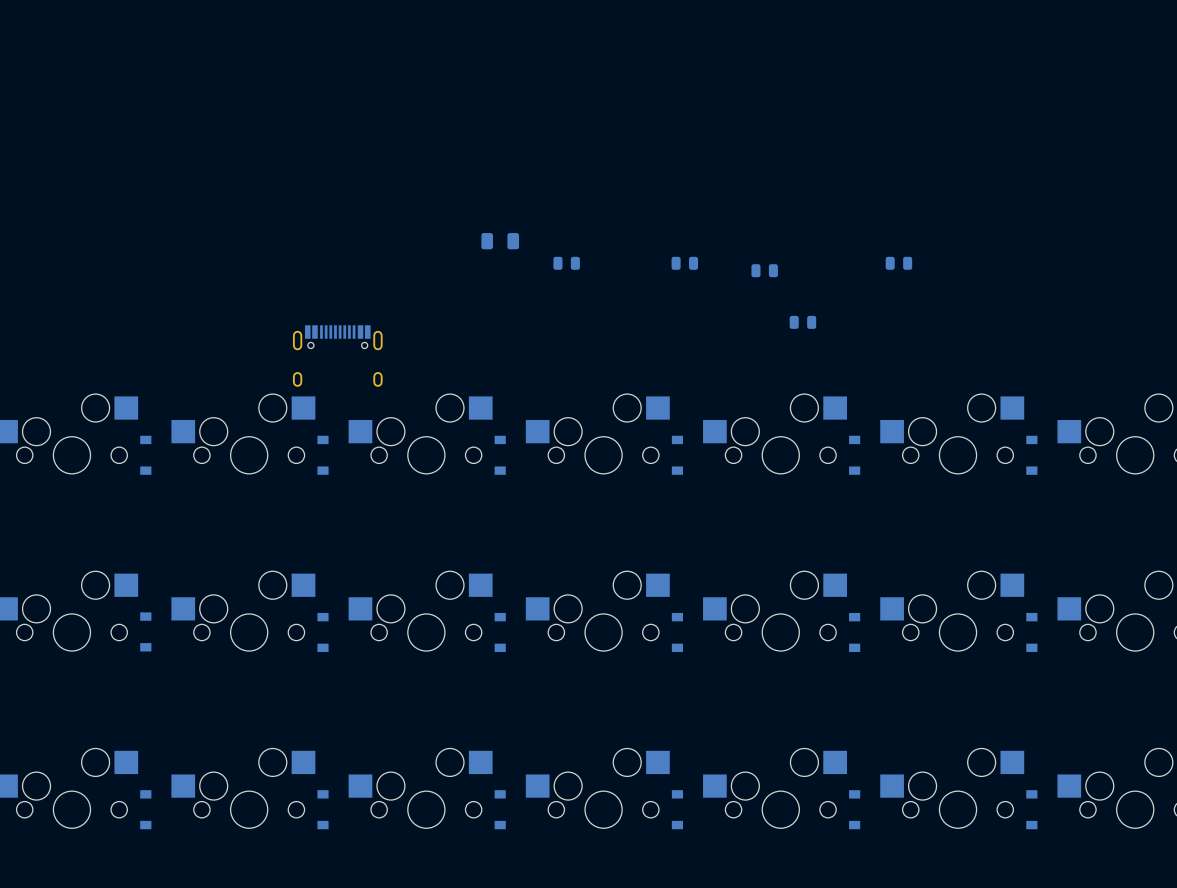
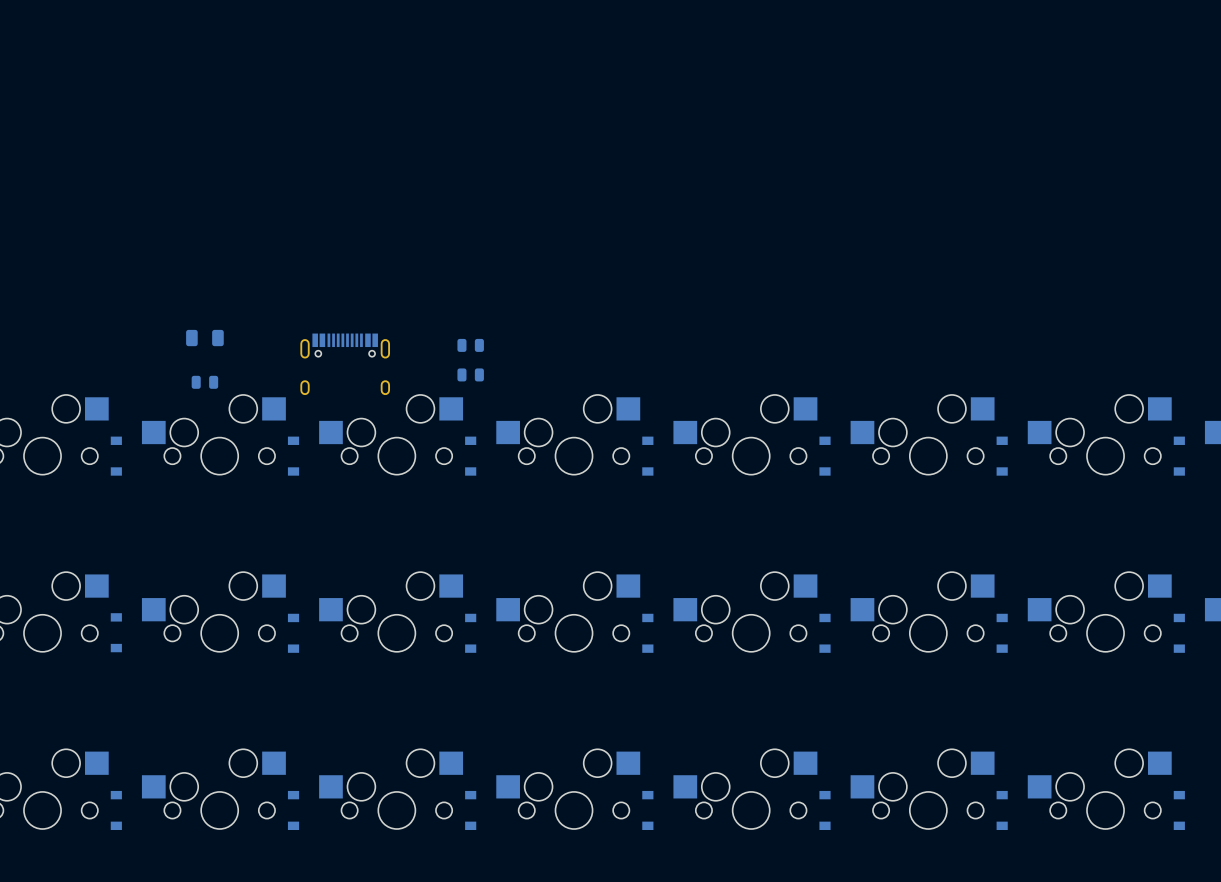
part: (500, 241) -> none
part: (566, 263) -> none
part: (684, 263) -> none
part: (898, 263) -> none
part: (764, 270) -> none
part: (802, 322) -> none
part: none -> (204, 338)
part: none -> (470, 345)
part position: (337, 356) -> (345, 364)
part: none -> (470, 374)
part: none -> (204, 382)

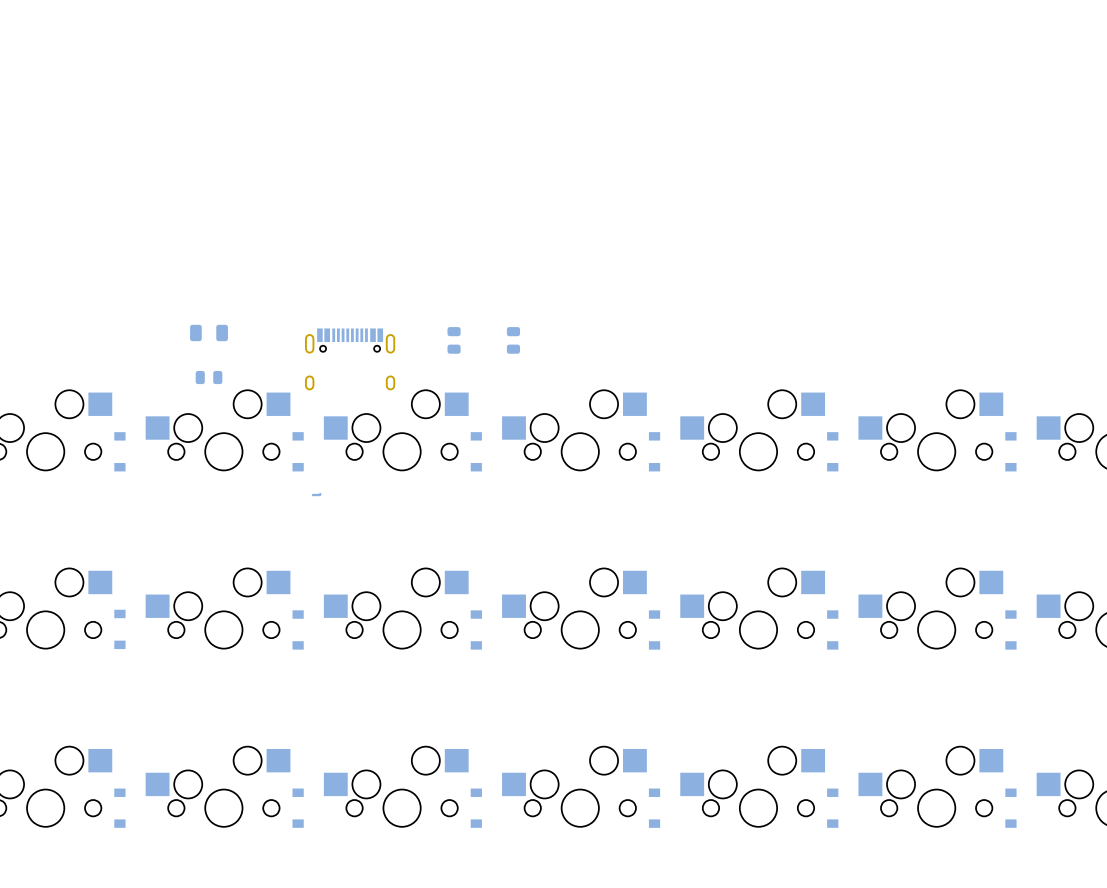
part: none -> (454, 340)
part: (470, 345) -> none
part: none -> (513, 340)
part: (470, 374) -> none
bottom track: none -> (320, 494) (312, 494)

